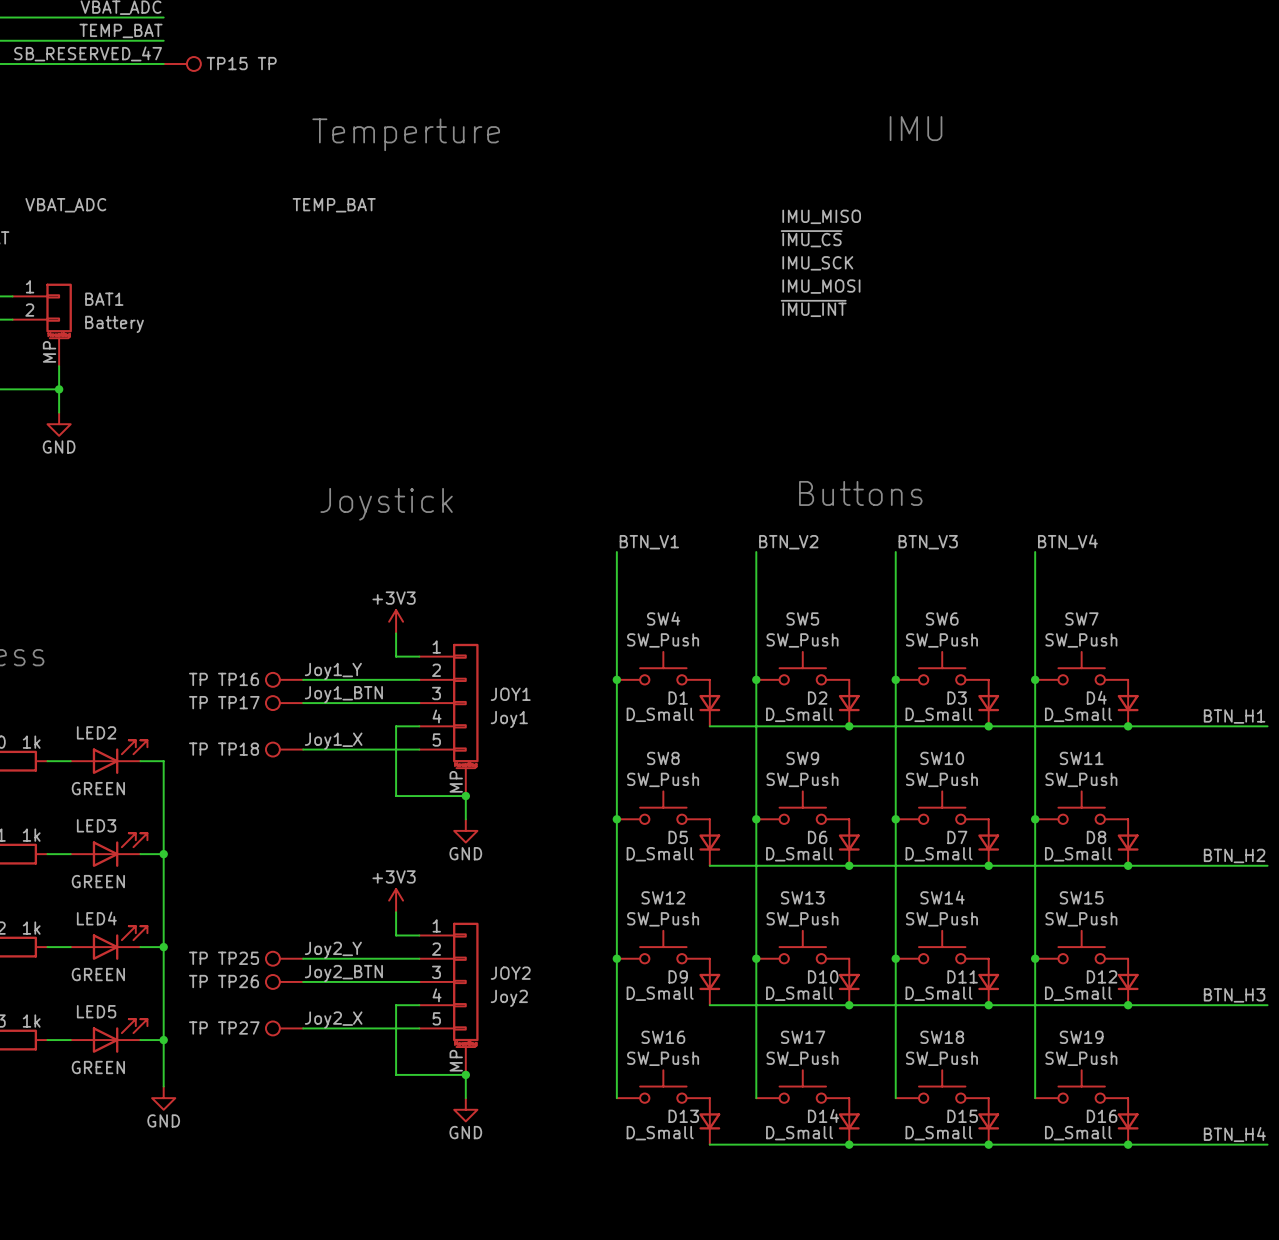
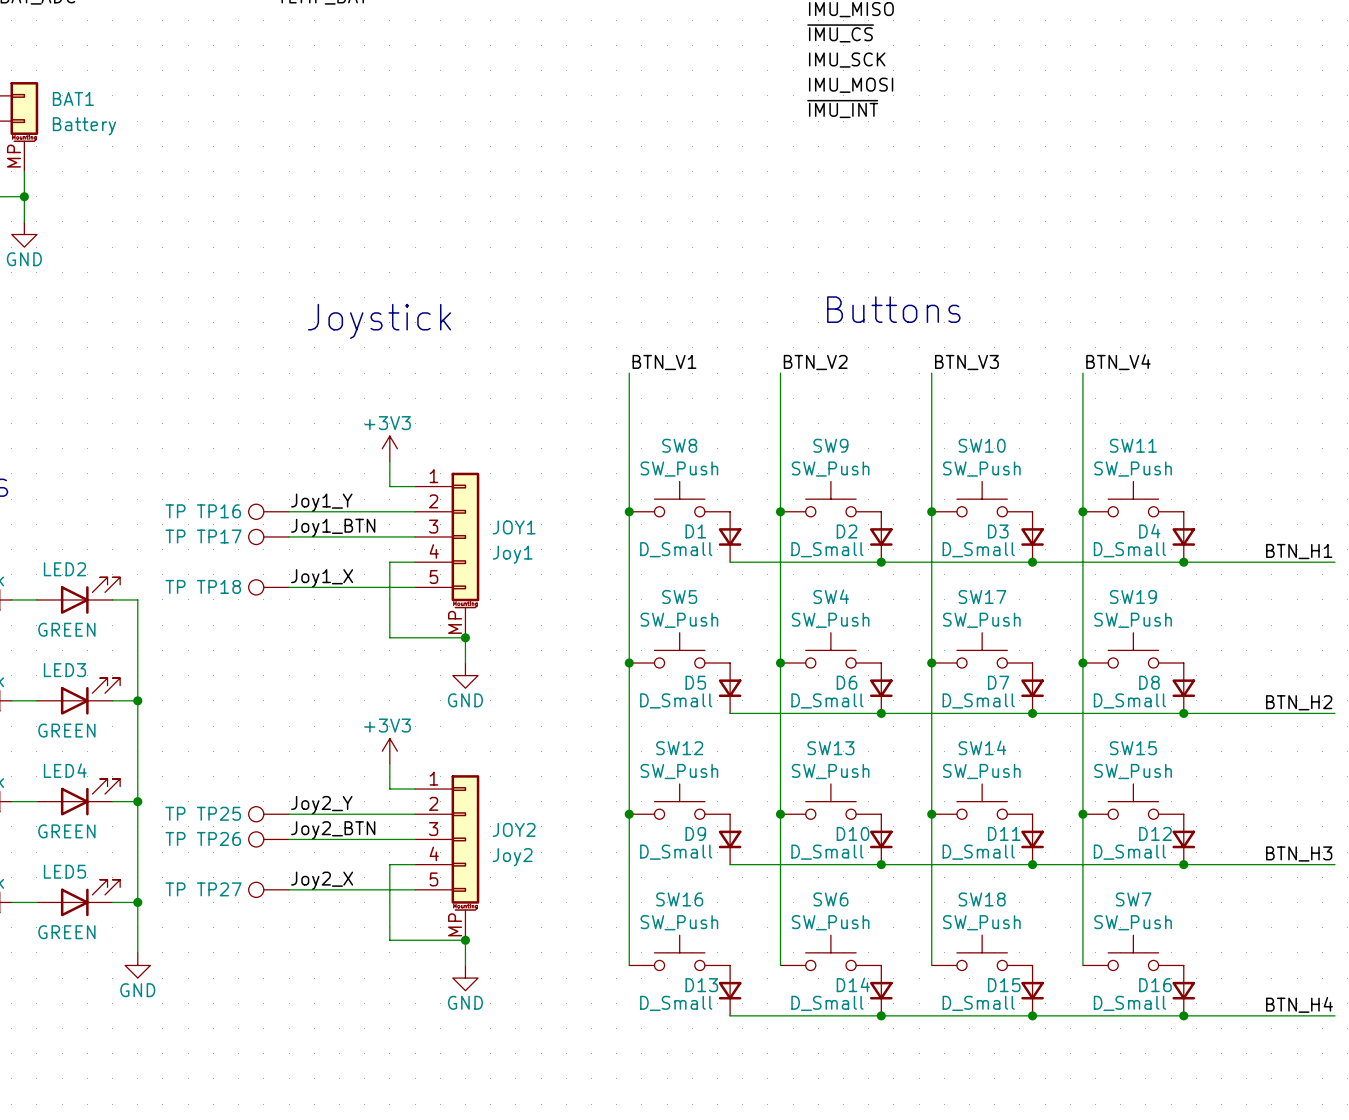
SW4 name: SW4 (663, 618) -> SW8 (679, 445)
SW5 name: SW5 (802, 618) -> SW9 (830, 445)
SW6 name: SW6 (942, 618) -> SW10 (982, 445)
SW7 name: SW7 (1081, 618) -> SW11 (1133, 445)
SW8 name: SW8 (663, 758) -> SW5 (679, 597)
SW9 name: SW9 (802, 758) -> SW4 (831, 596)
SW10 name: SW10 (942, 758) -> SW17 (982, 597)
SW11 name: SW11 (1081, 758) -> SW19 (1133, 597)
SW17 name: SW17 (803, 1037) -> SW6 (830, 899)
SW19 name: SW19 (1081, 1037) -> SW7 (1133, 899)

